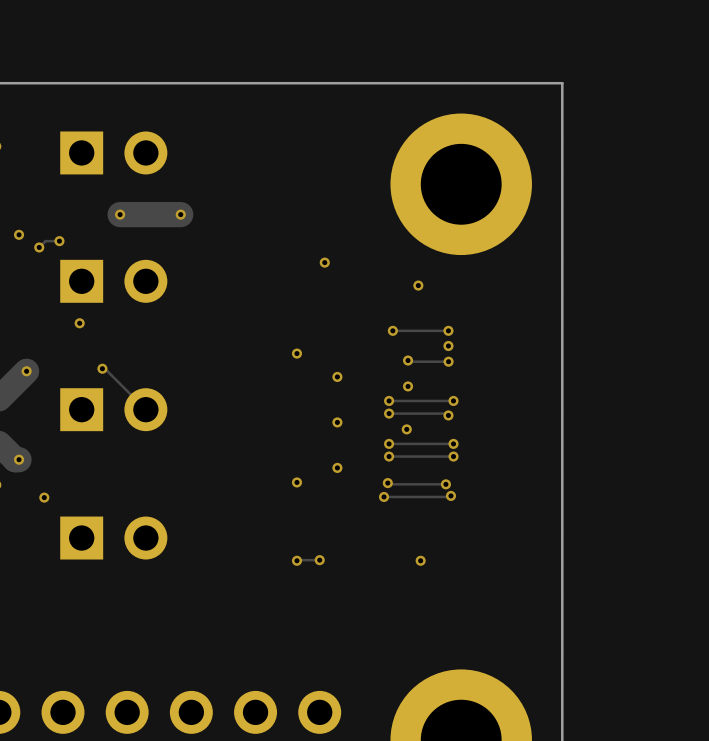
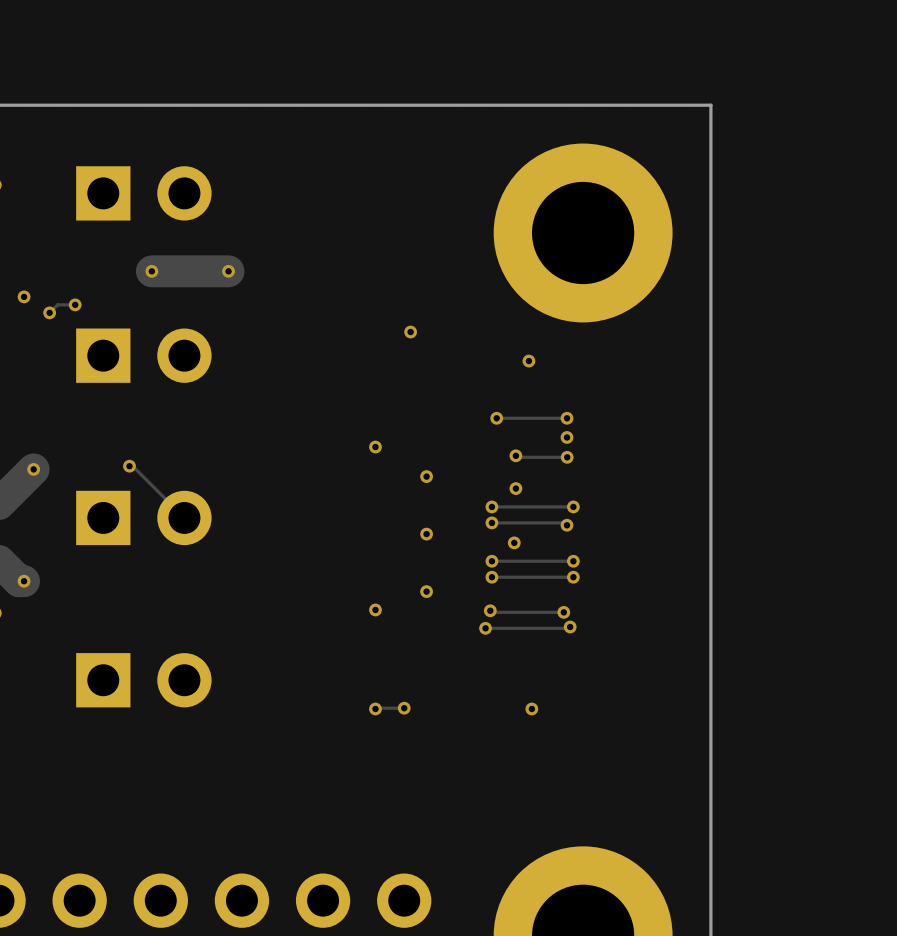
via: (79, 323) -> none
via: (44, 497) -> none

